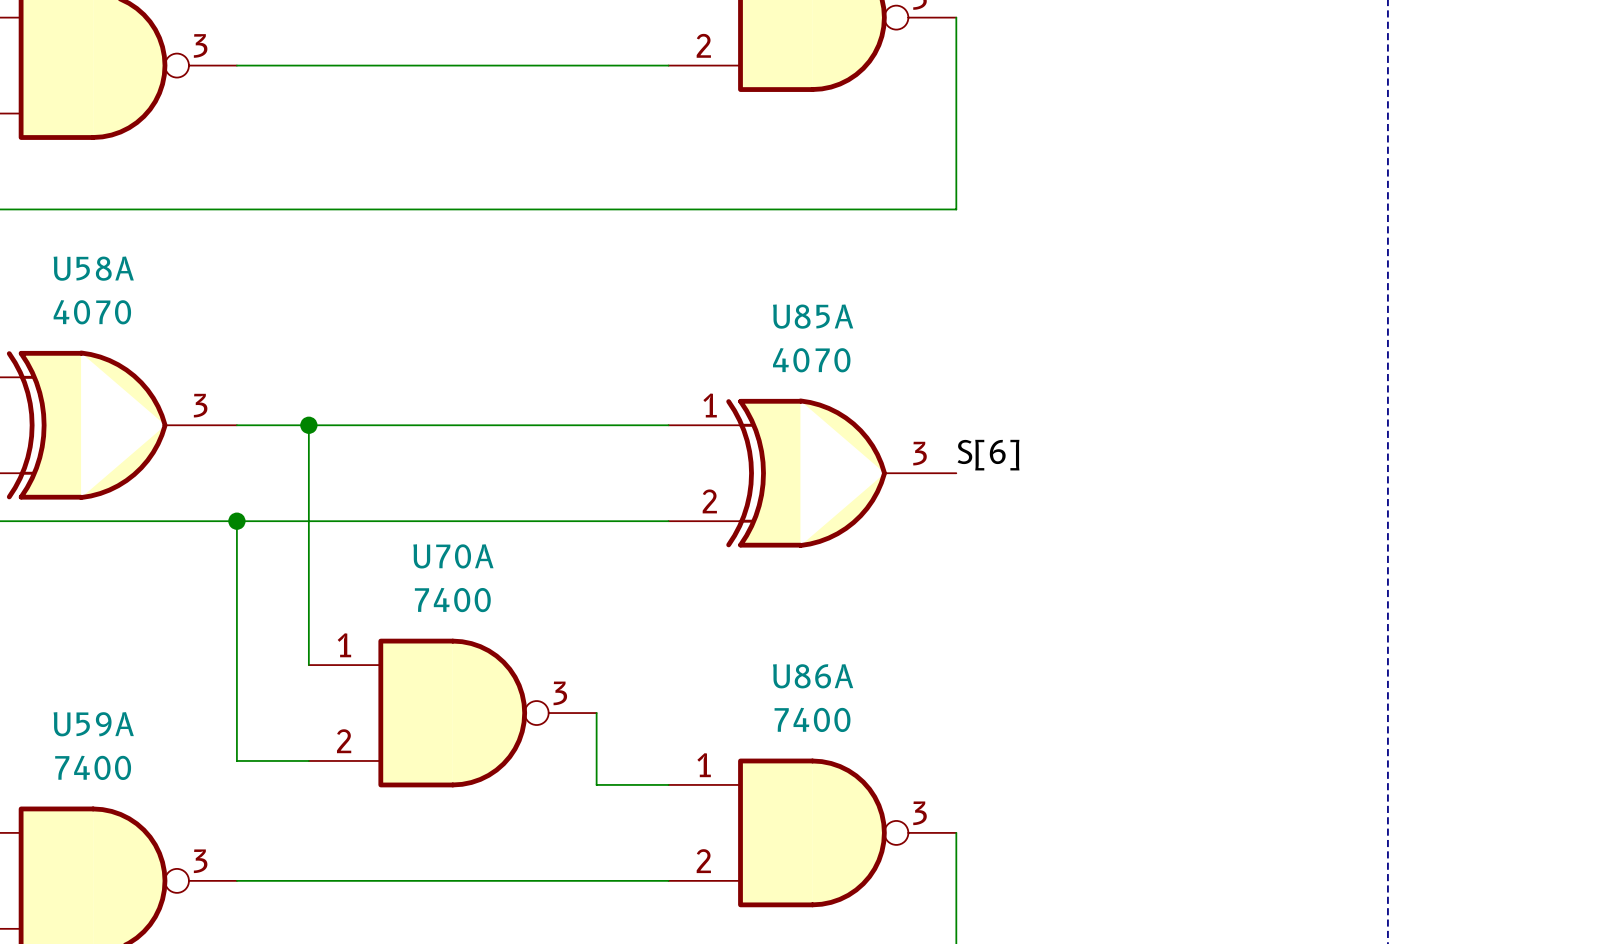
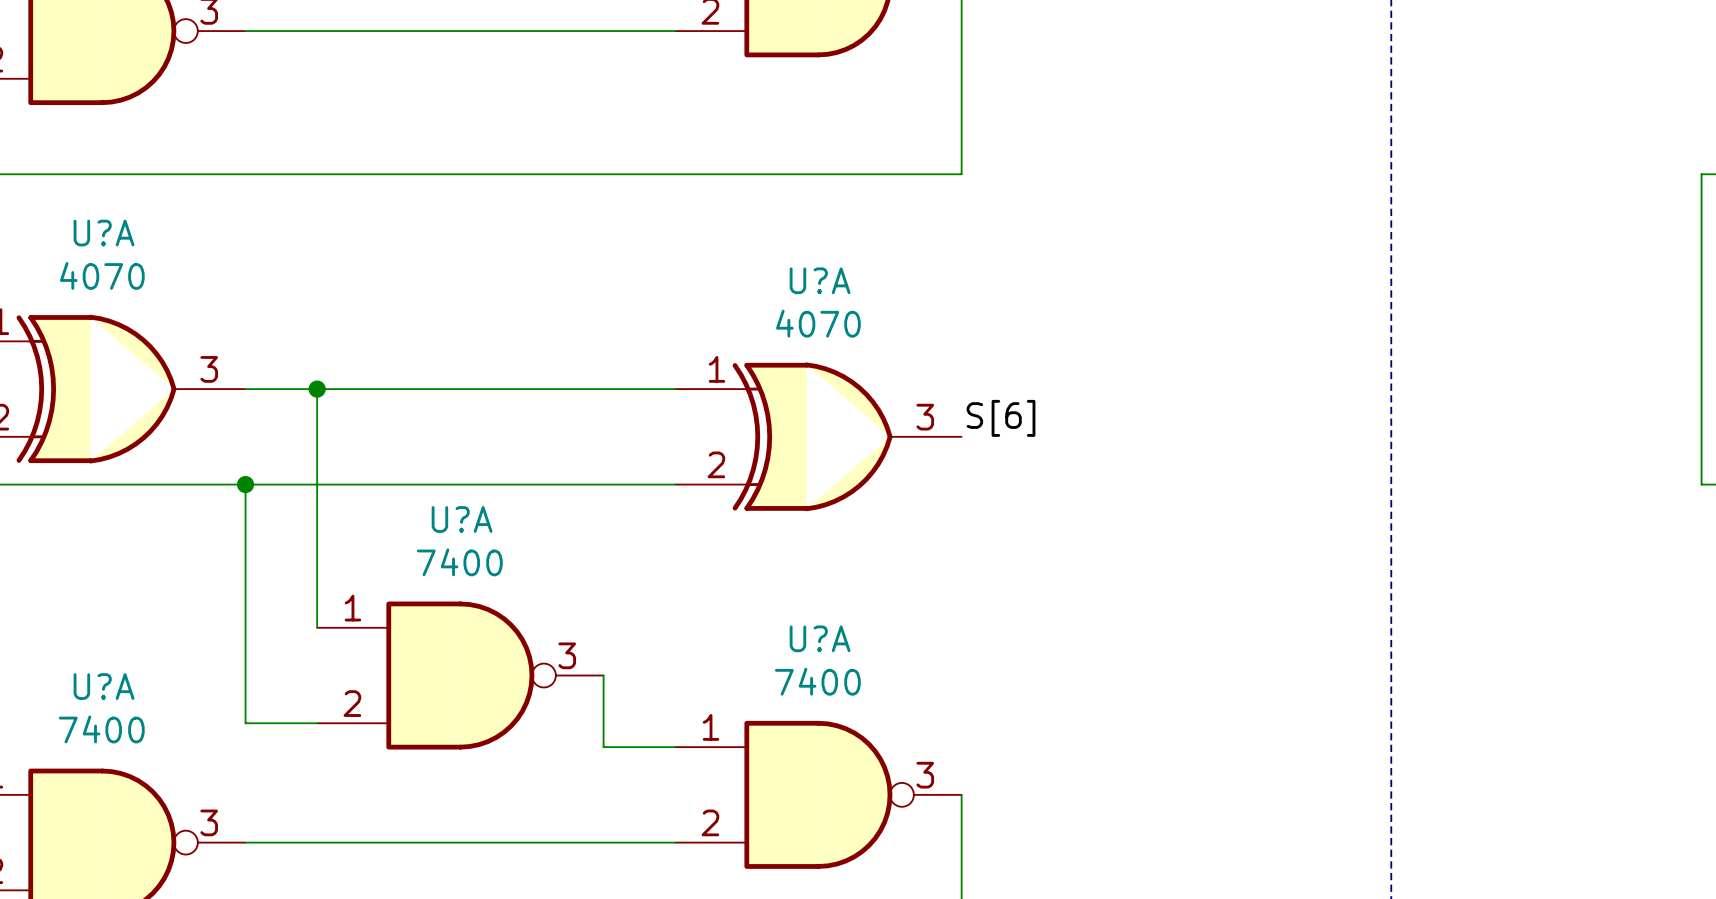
U58A name: U58A (93, 268) -> U?A (104, 233)
U85A name: U85A (813, 316) -> U?A (820, 280)
U70A name: U70A (453, 556) -> U?A (462, 519)
U86A name: U86A (813, 676) -> U?A (820, 638)
U59A name: U59A (93, 724) -> U?A (104, 686)

